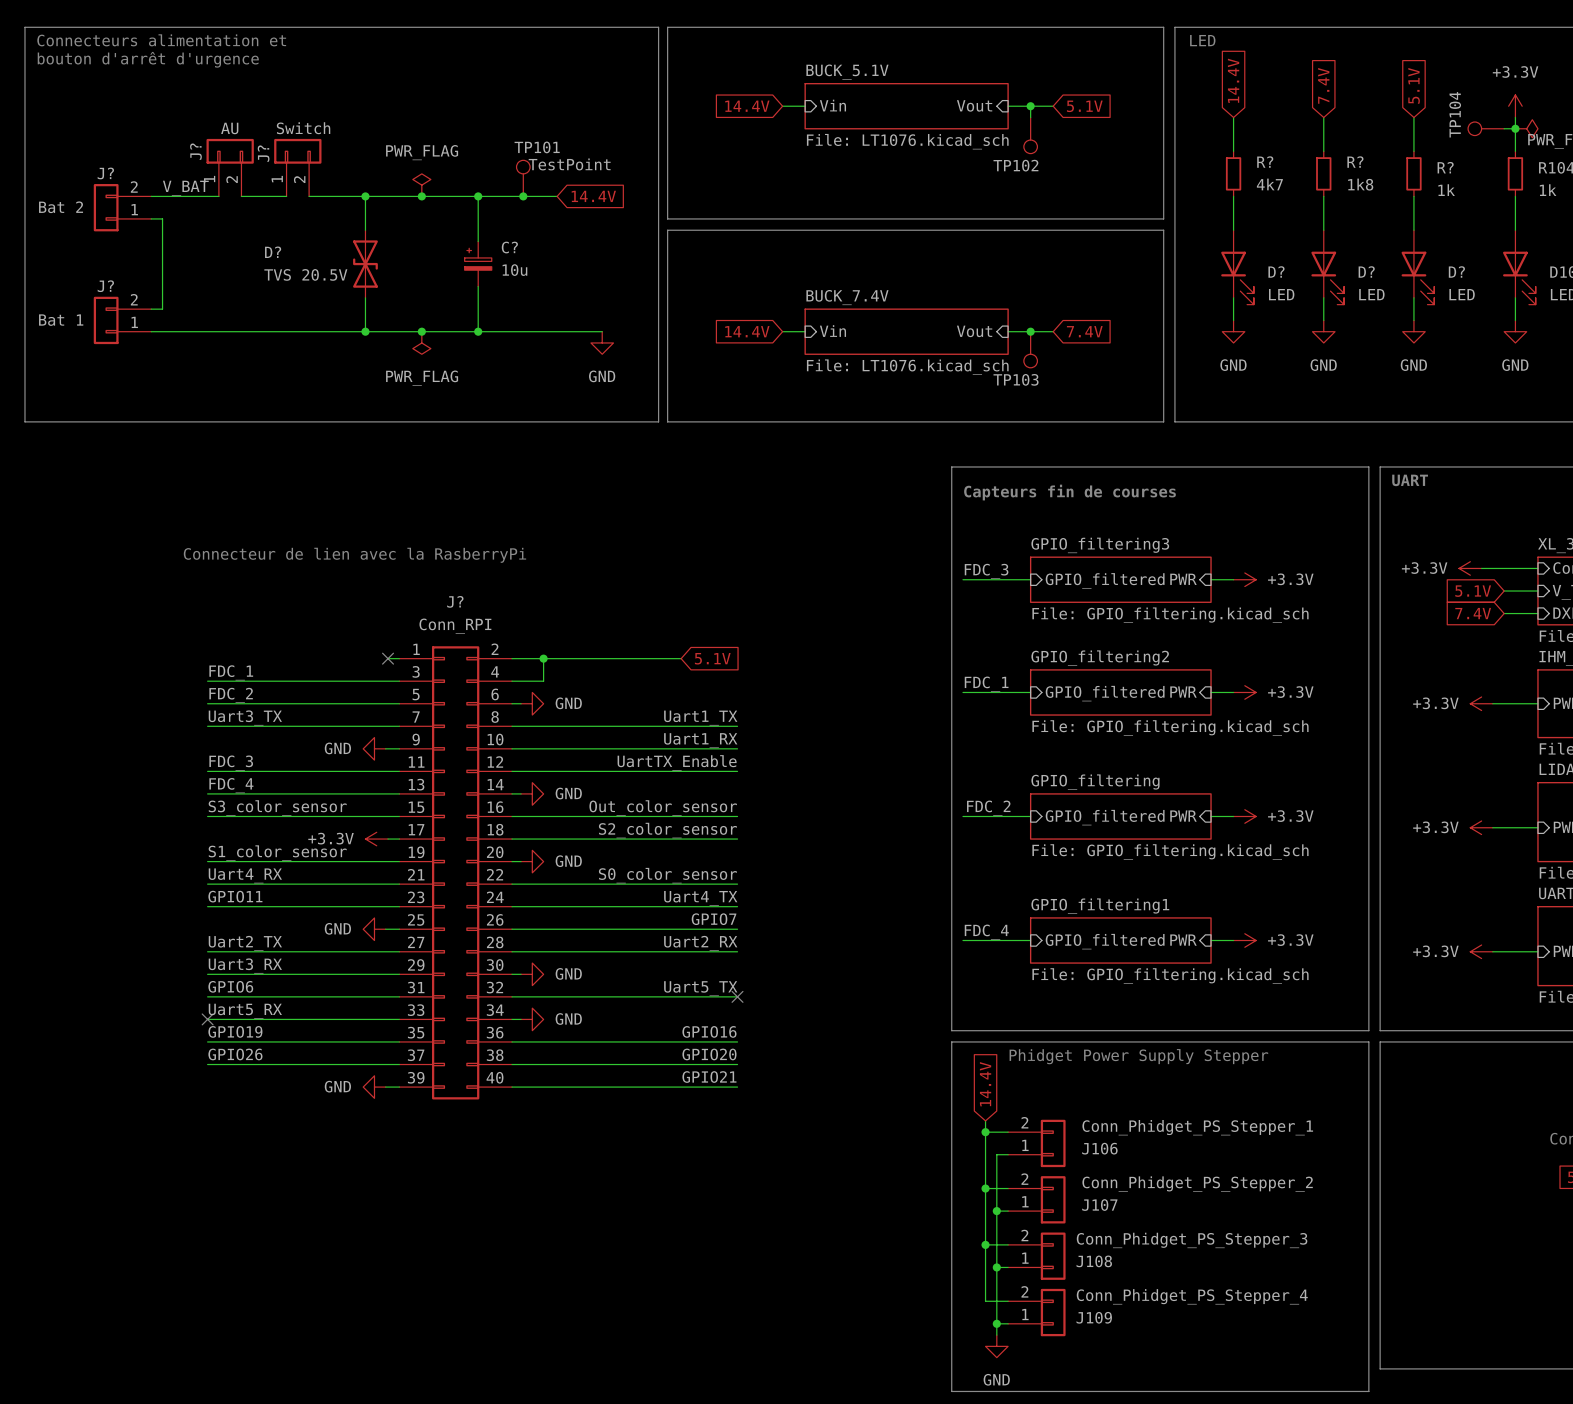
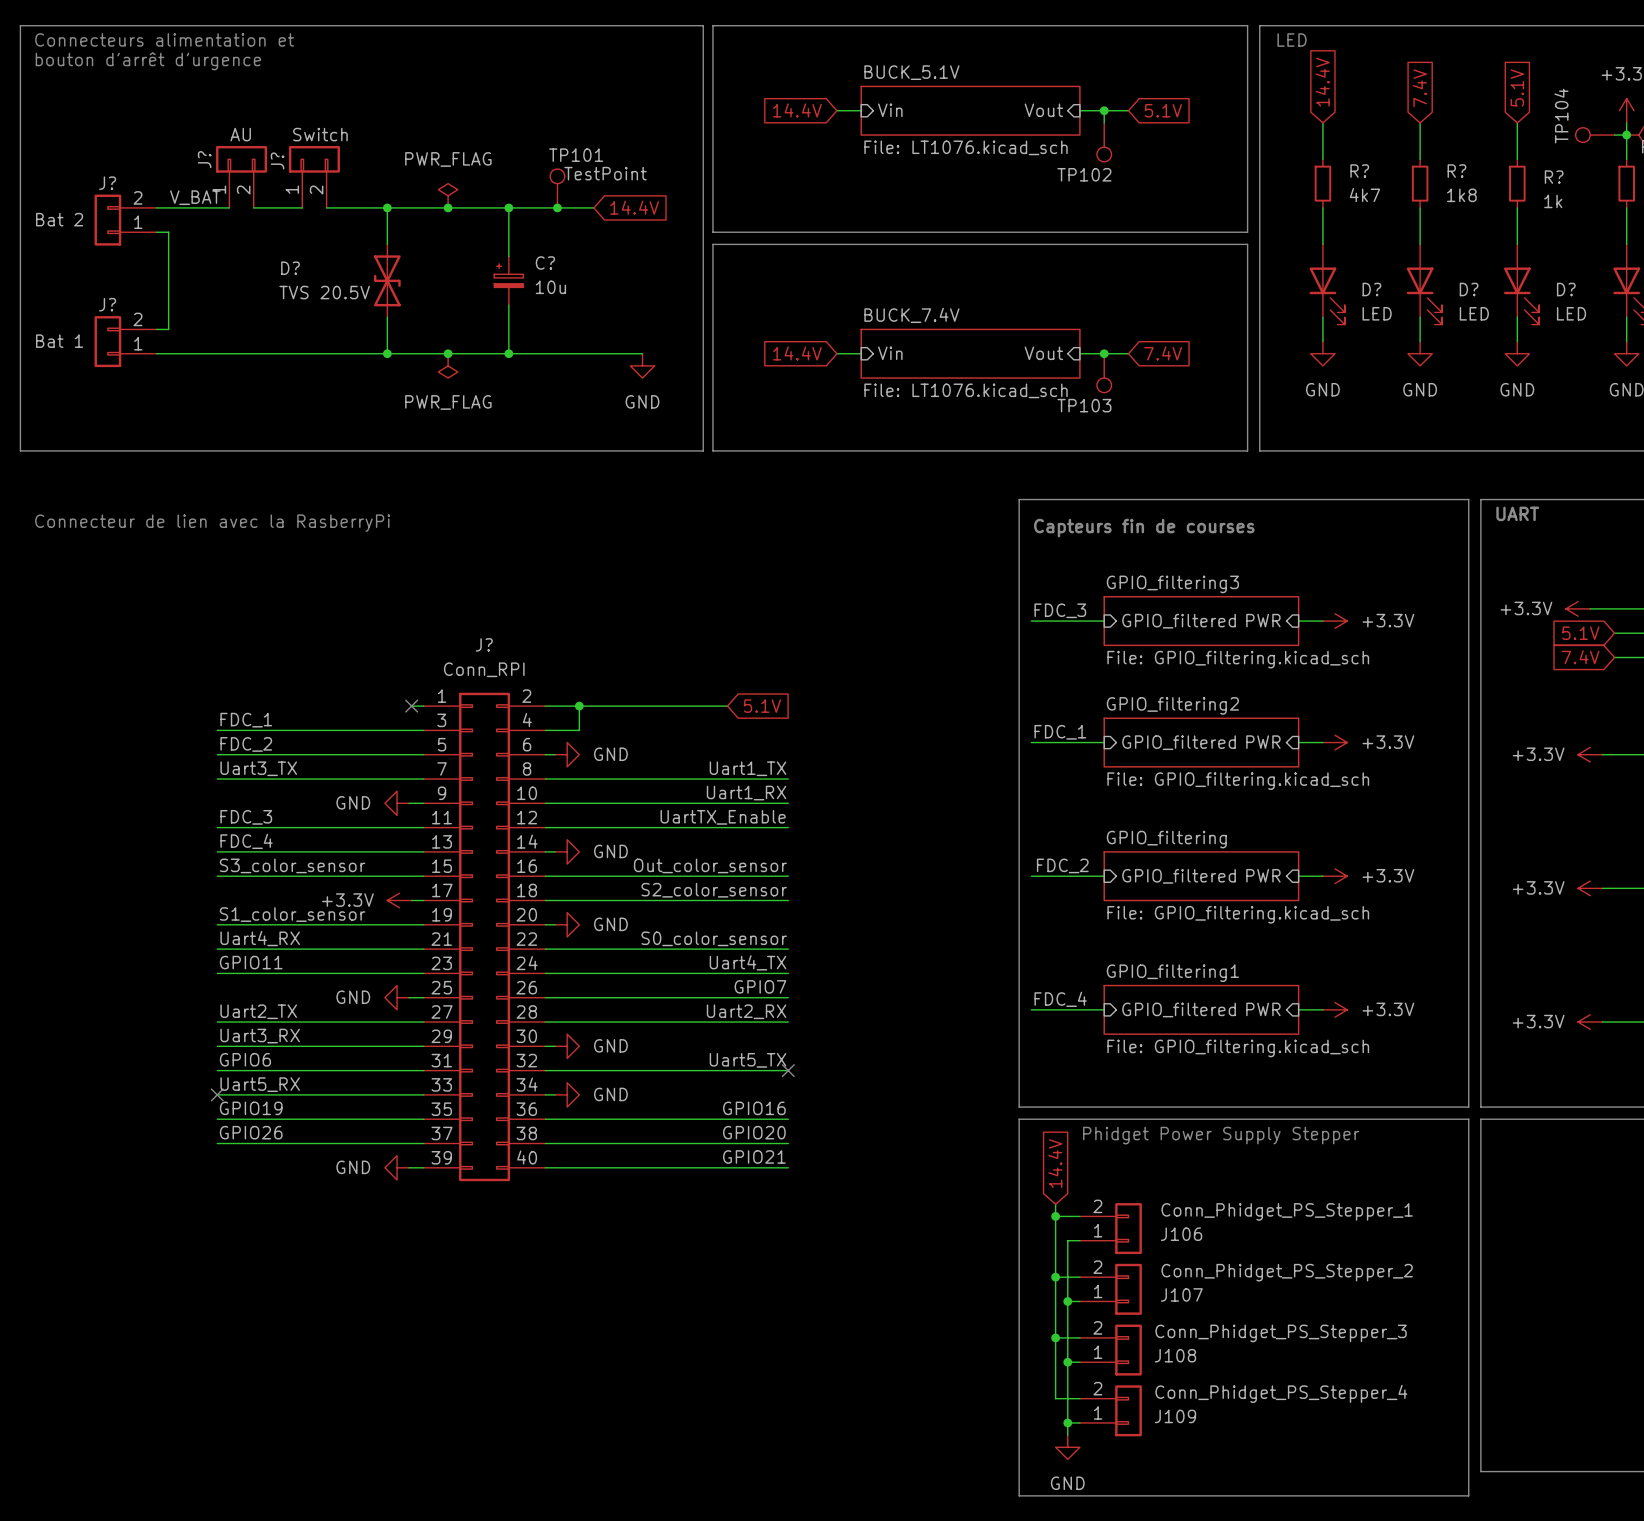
text position: Connecteur de lien avec la RasberryPi (354, 555) -> Connecteur de lien avec la RasberryPi (212, 523)

